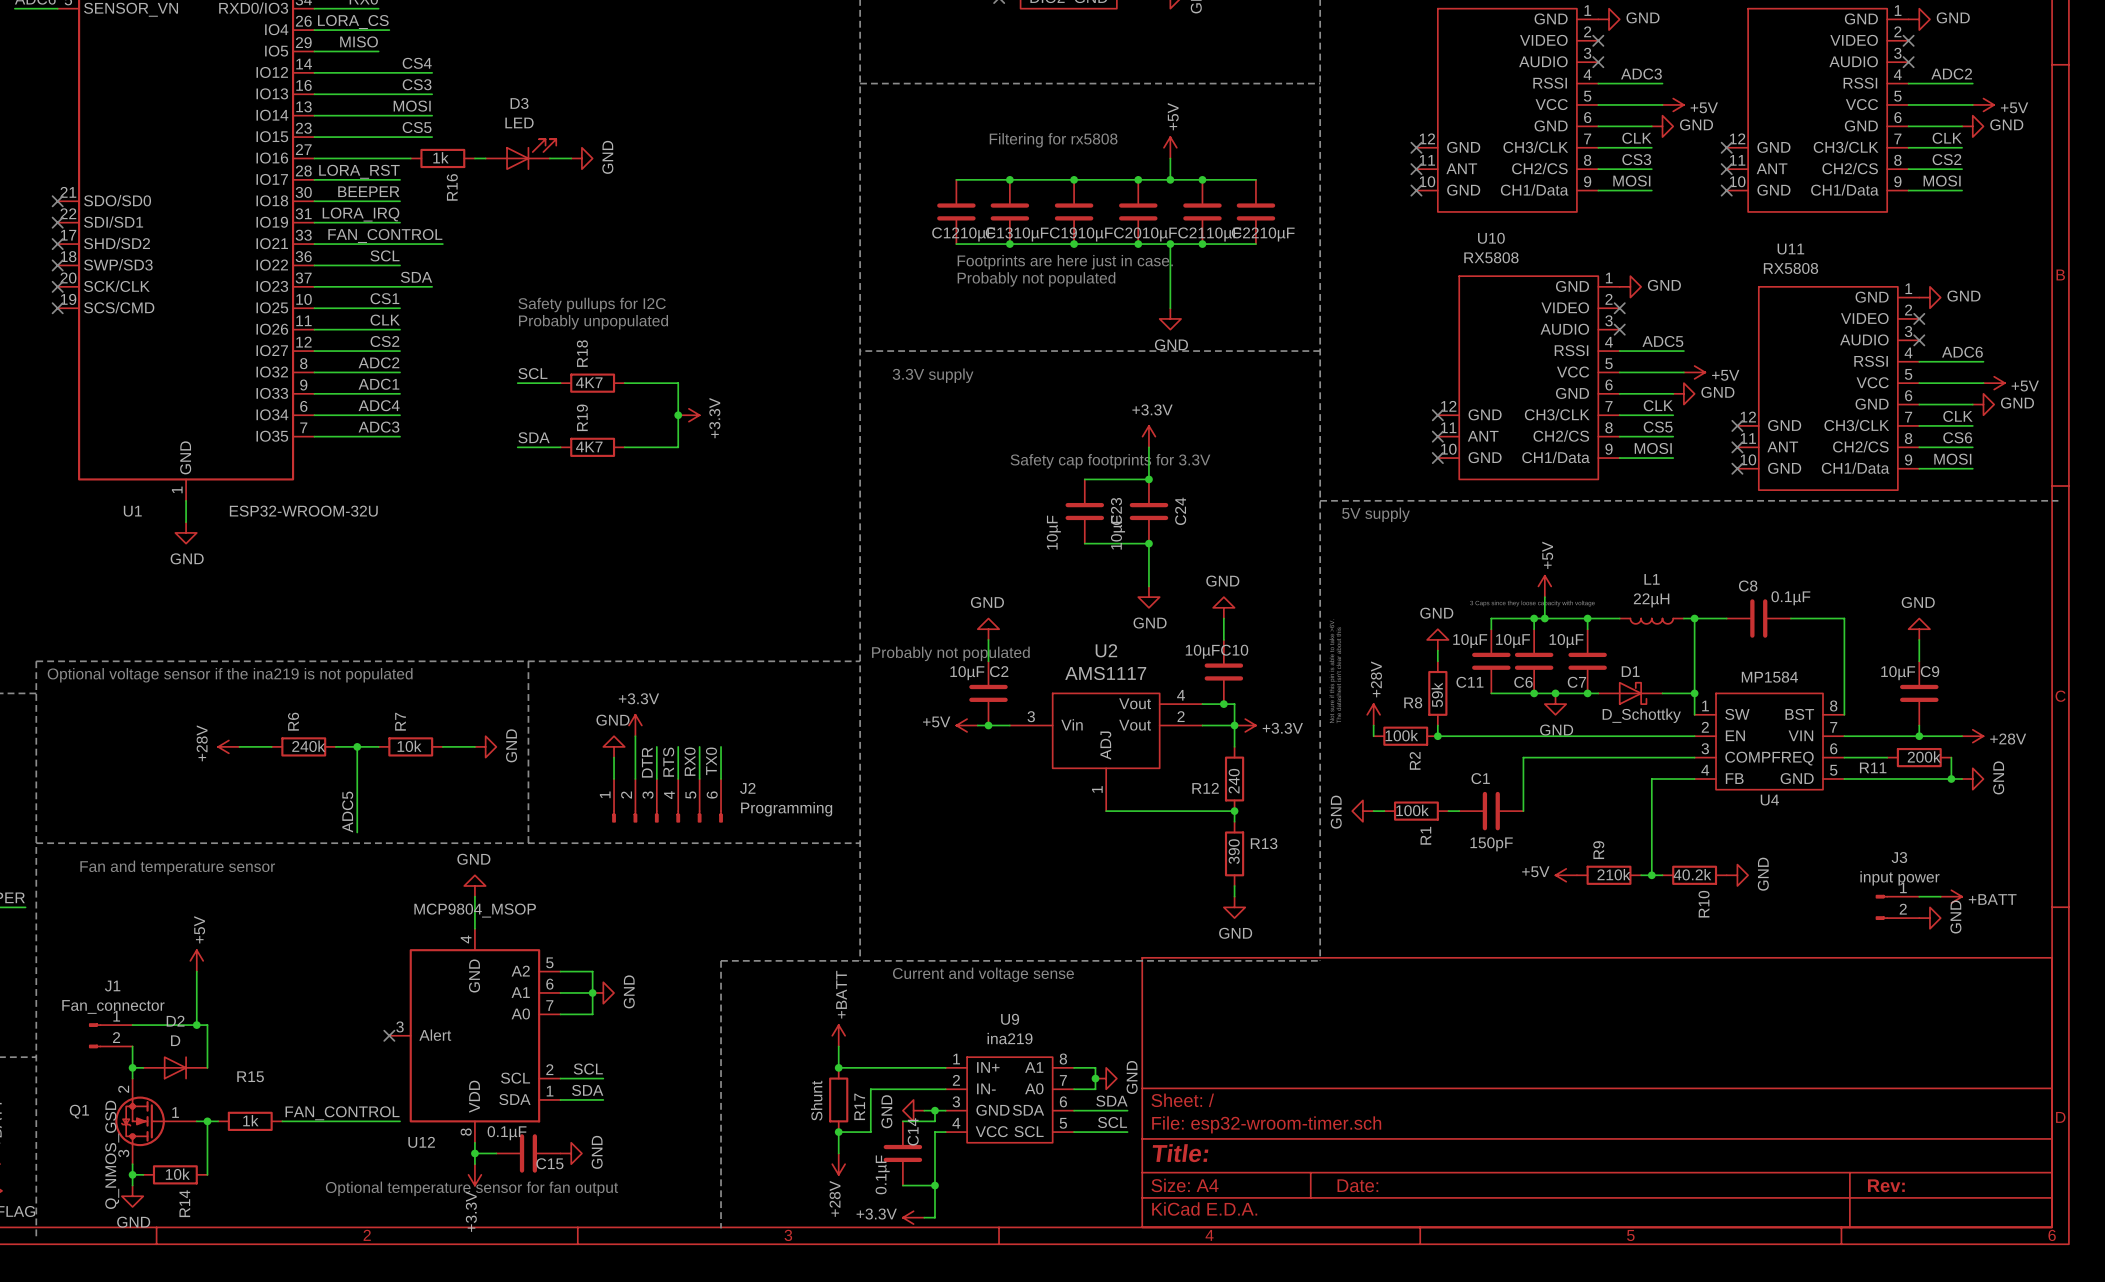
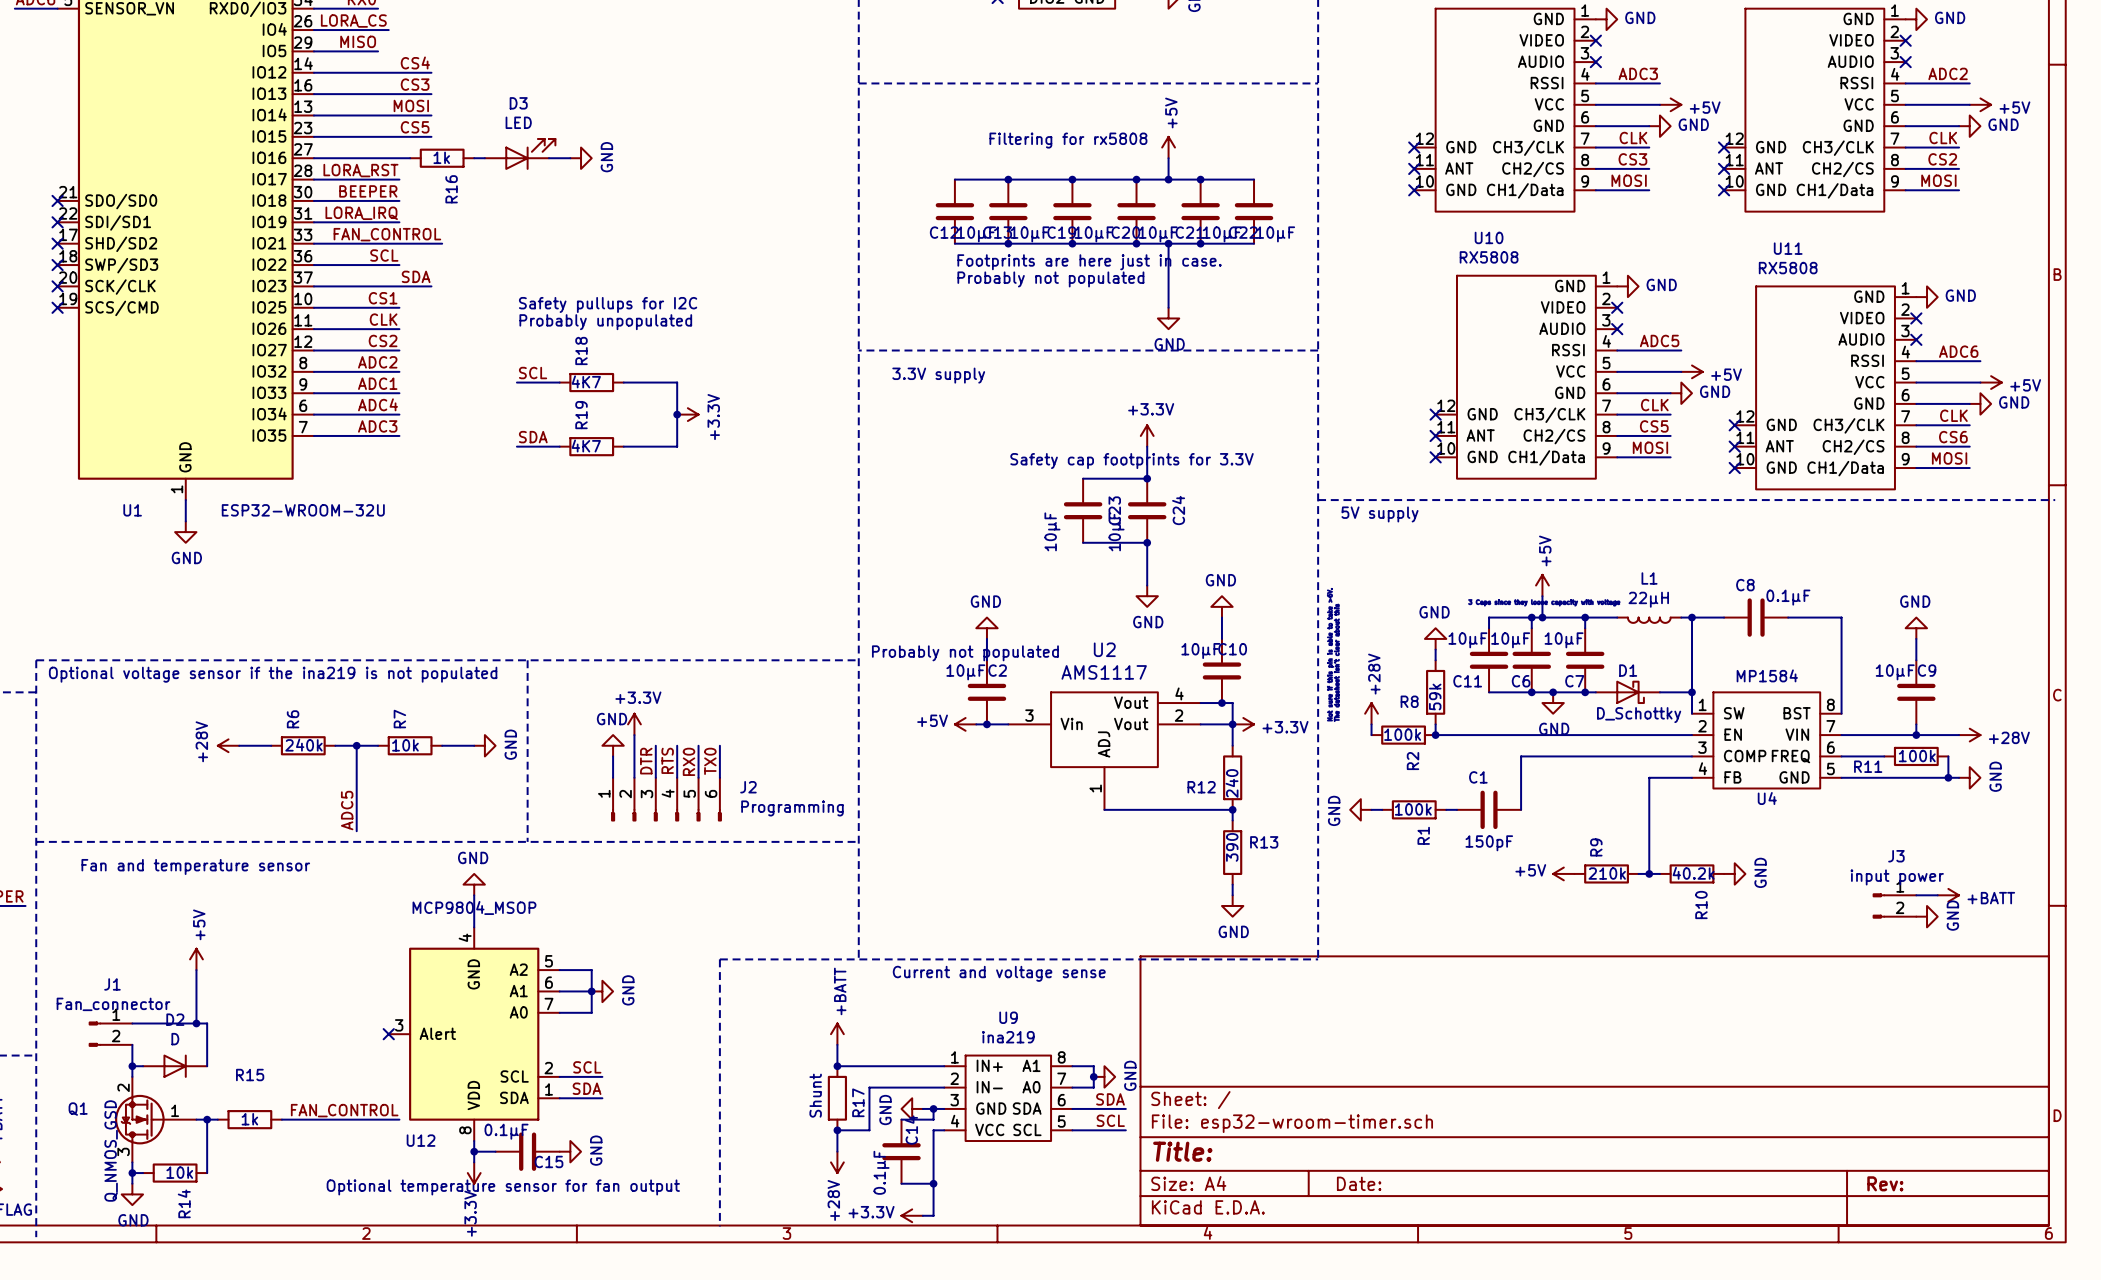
R11 value: 200k (1924, 756) -> 100k (1917, 756)

